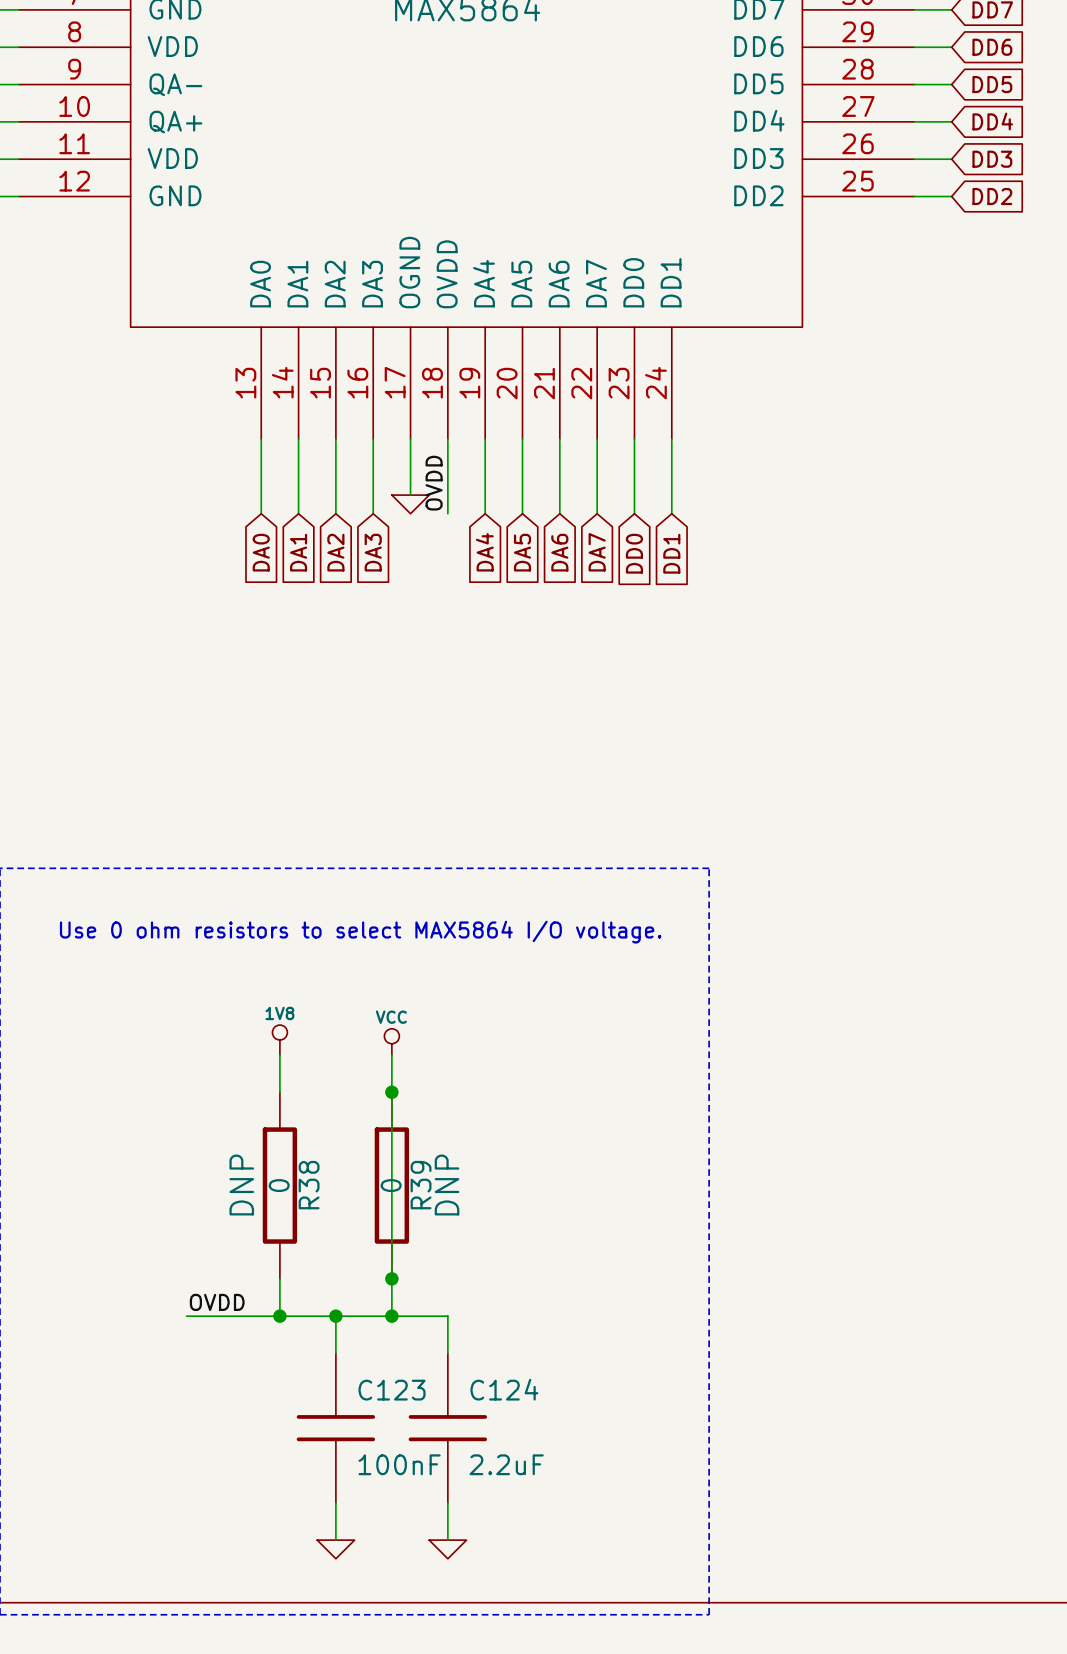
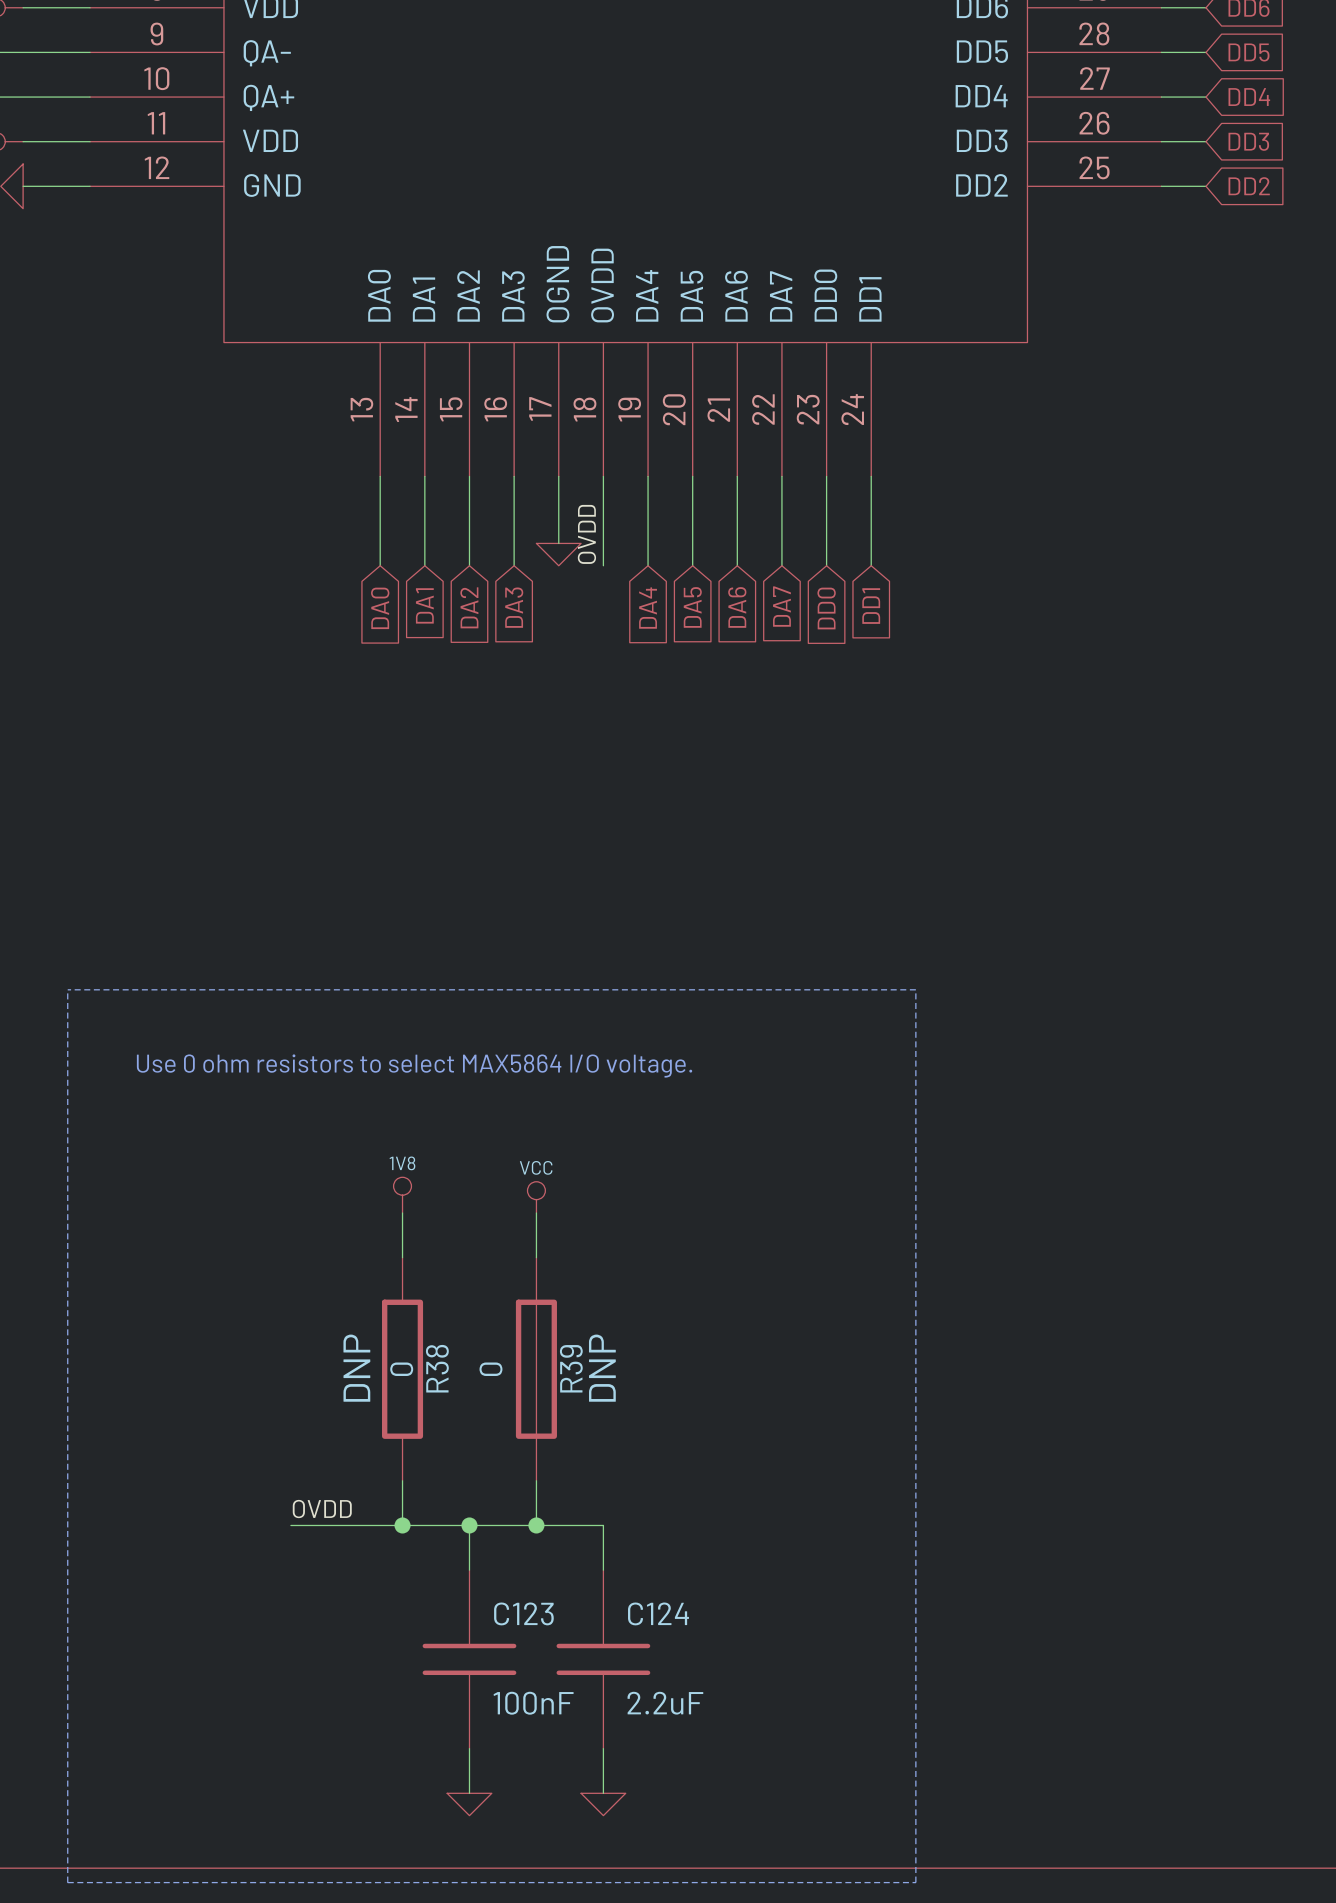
R39 symbol: [374, 1092, 410, 1279] -> [515, 1257, 557, 1481]
junction: (391, 1092) -> none
R39 value position: 0 (391, 1185) -> 0 (490, 1369)
junction: (391, 1278) -> none

